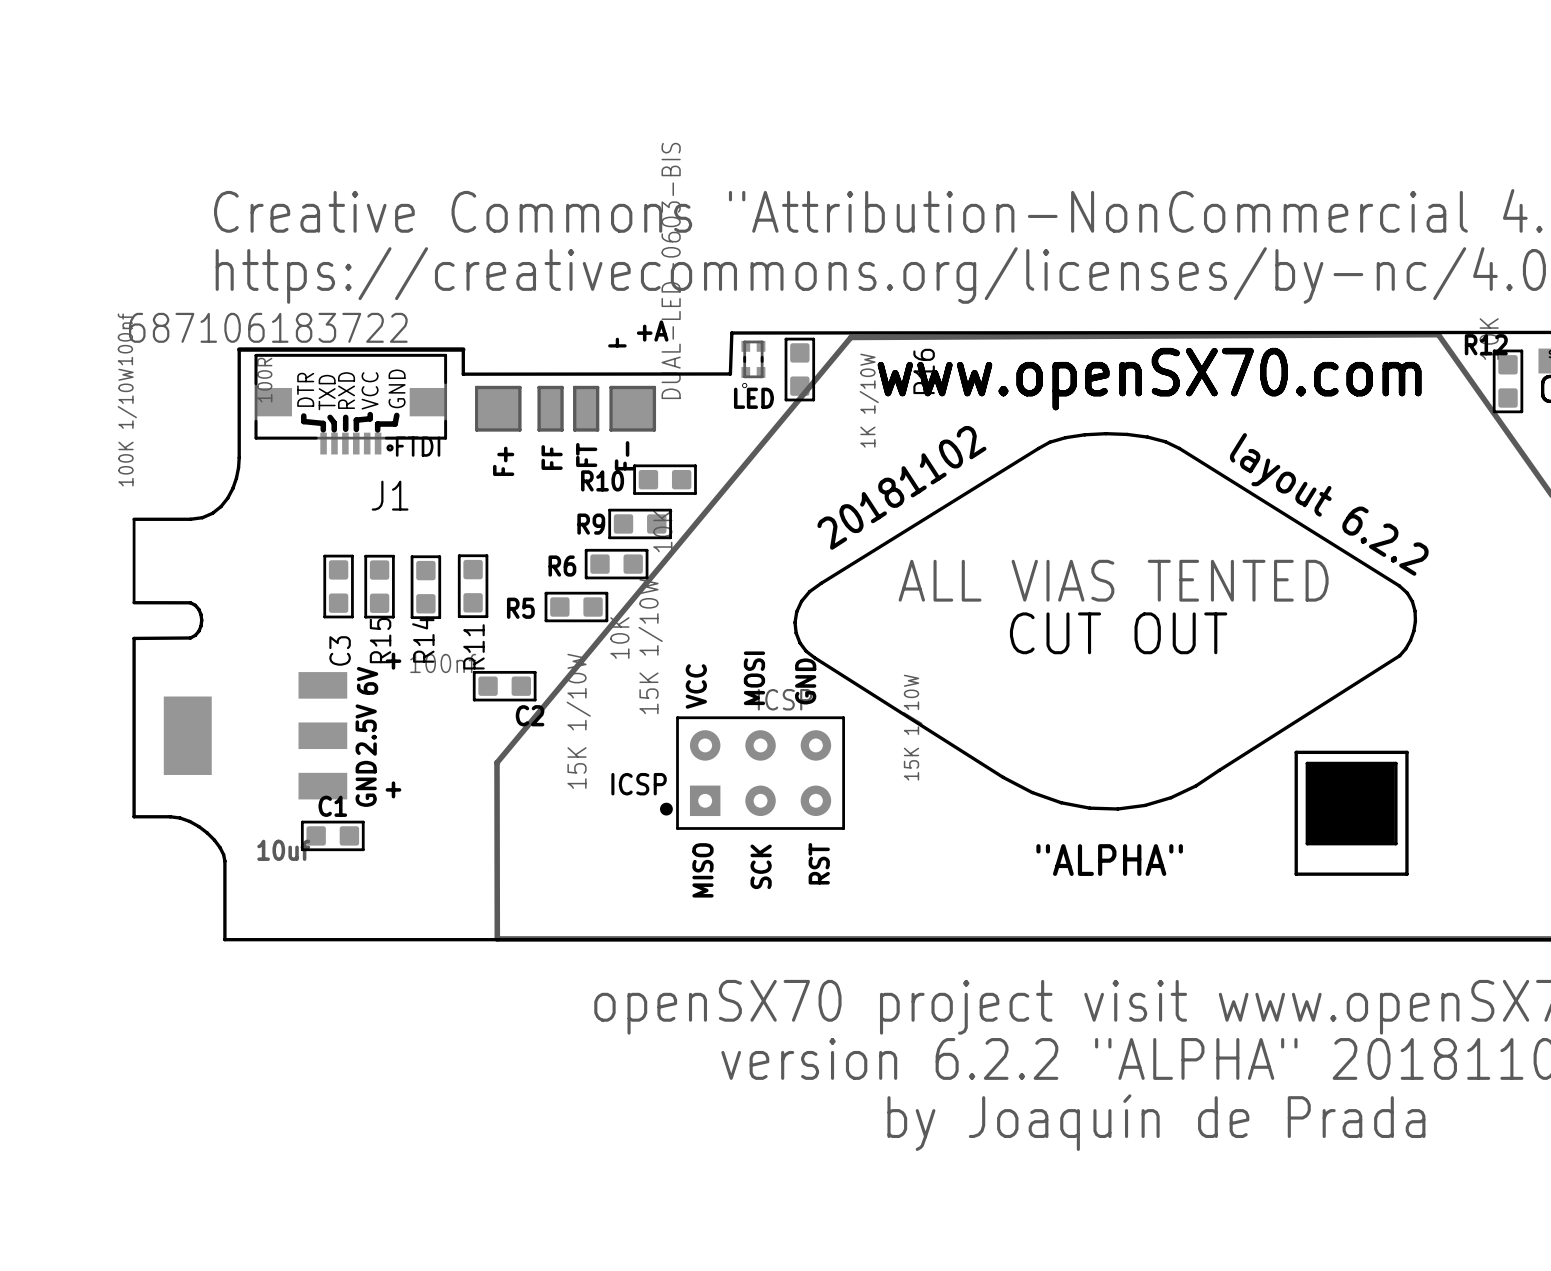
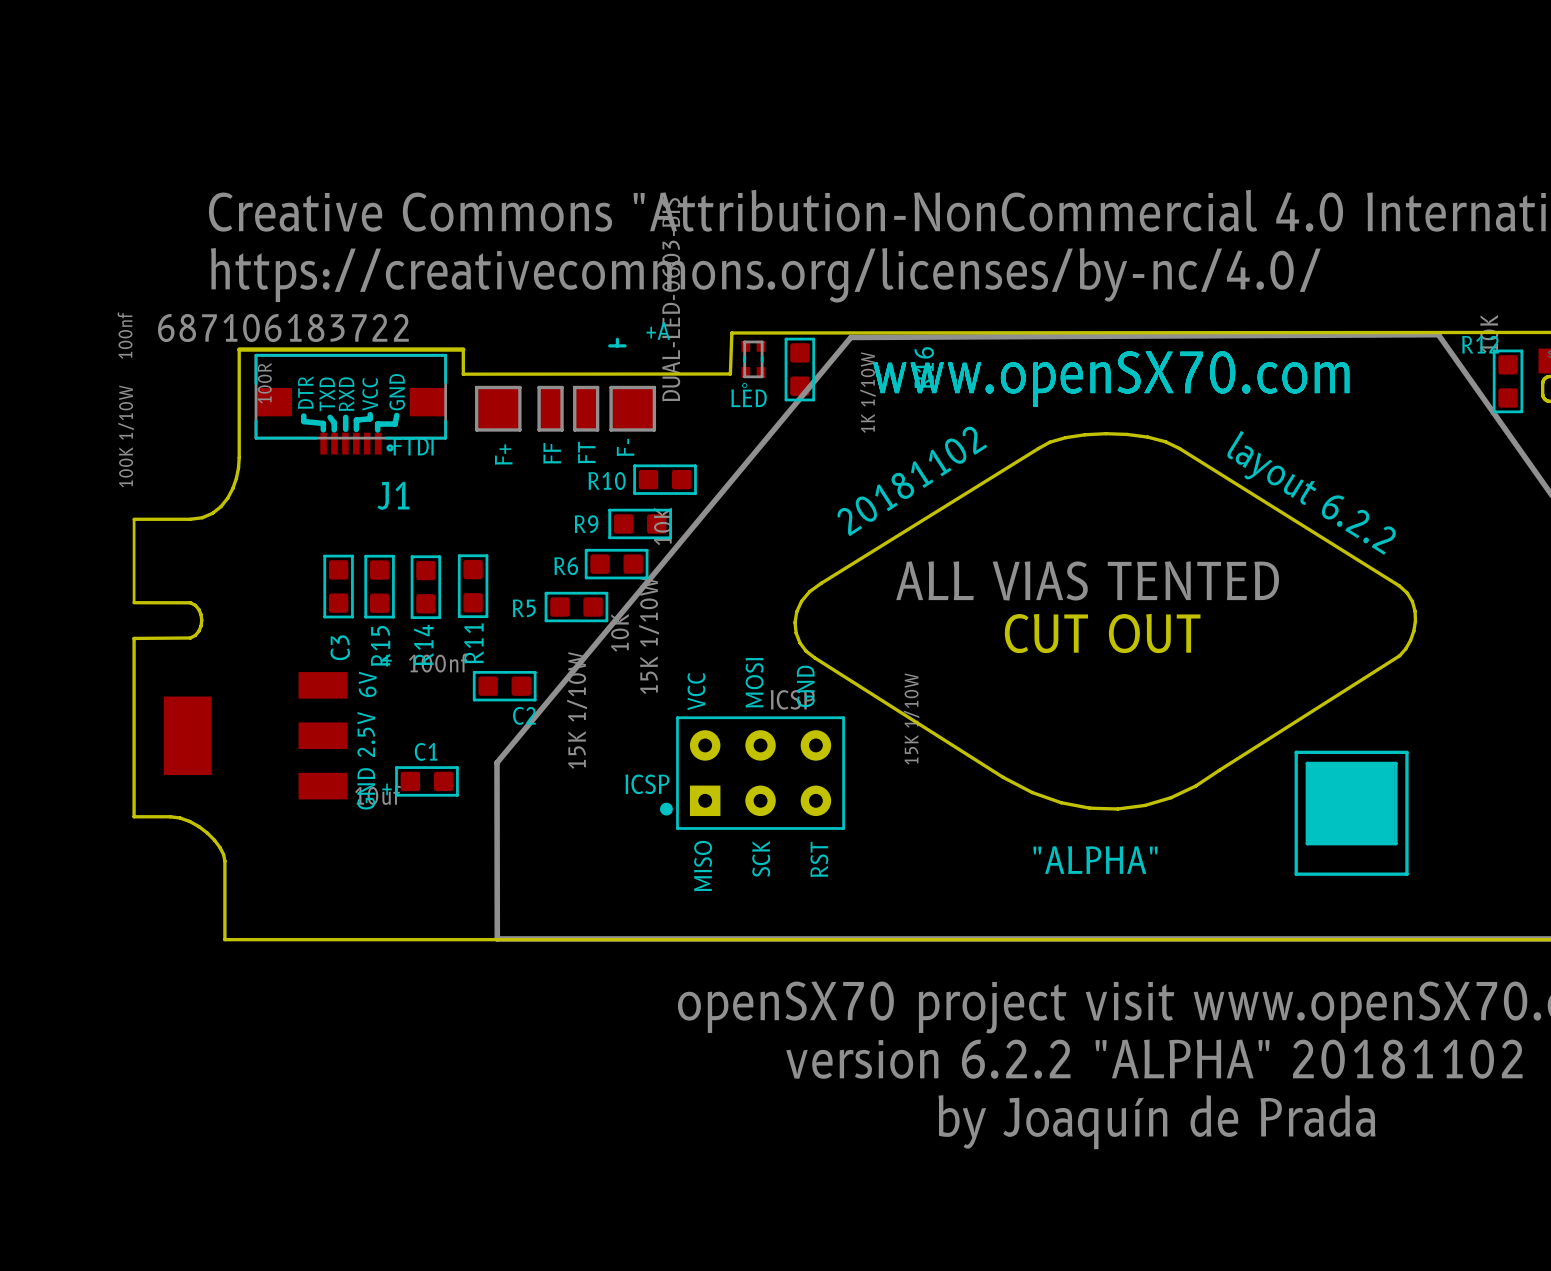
C1 position: (332, 835) -> (426, 781)

